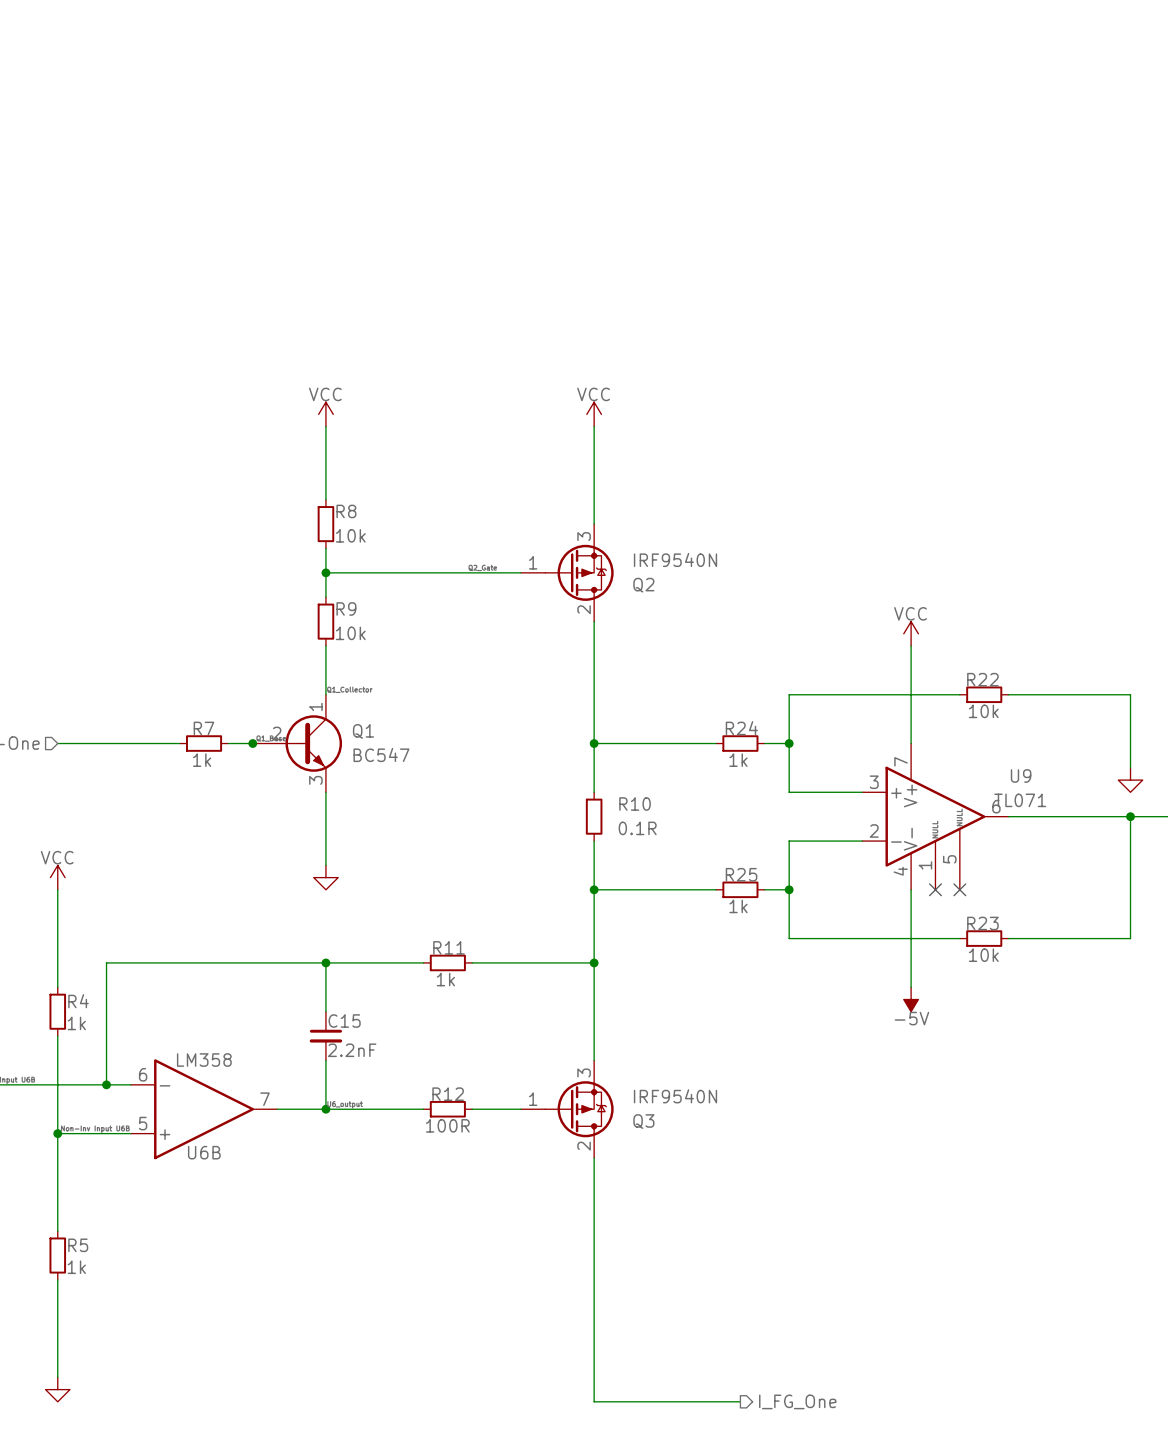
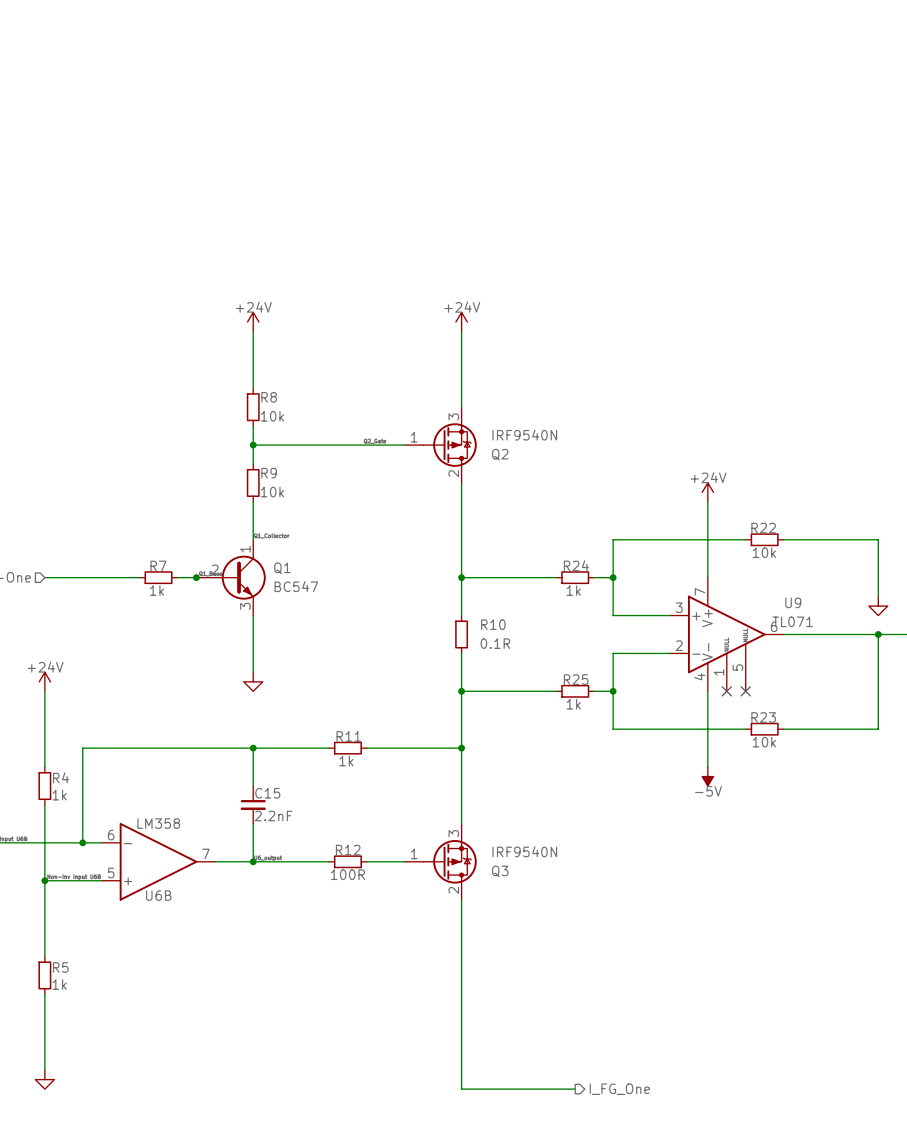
power symbol: VCC (325, 414) -> +24V (253, 321)
power symbol: VCC (594, 414) -> +24V (461, 321)
power symbol: VCC (911, 633) -> +24V (707, 492)
power symbol: VCC (57, 877) -> +24V (44, 681)

